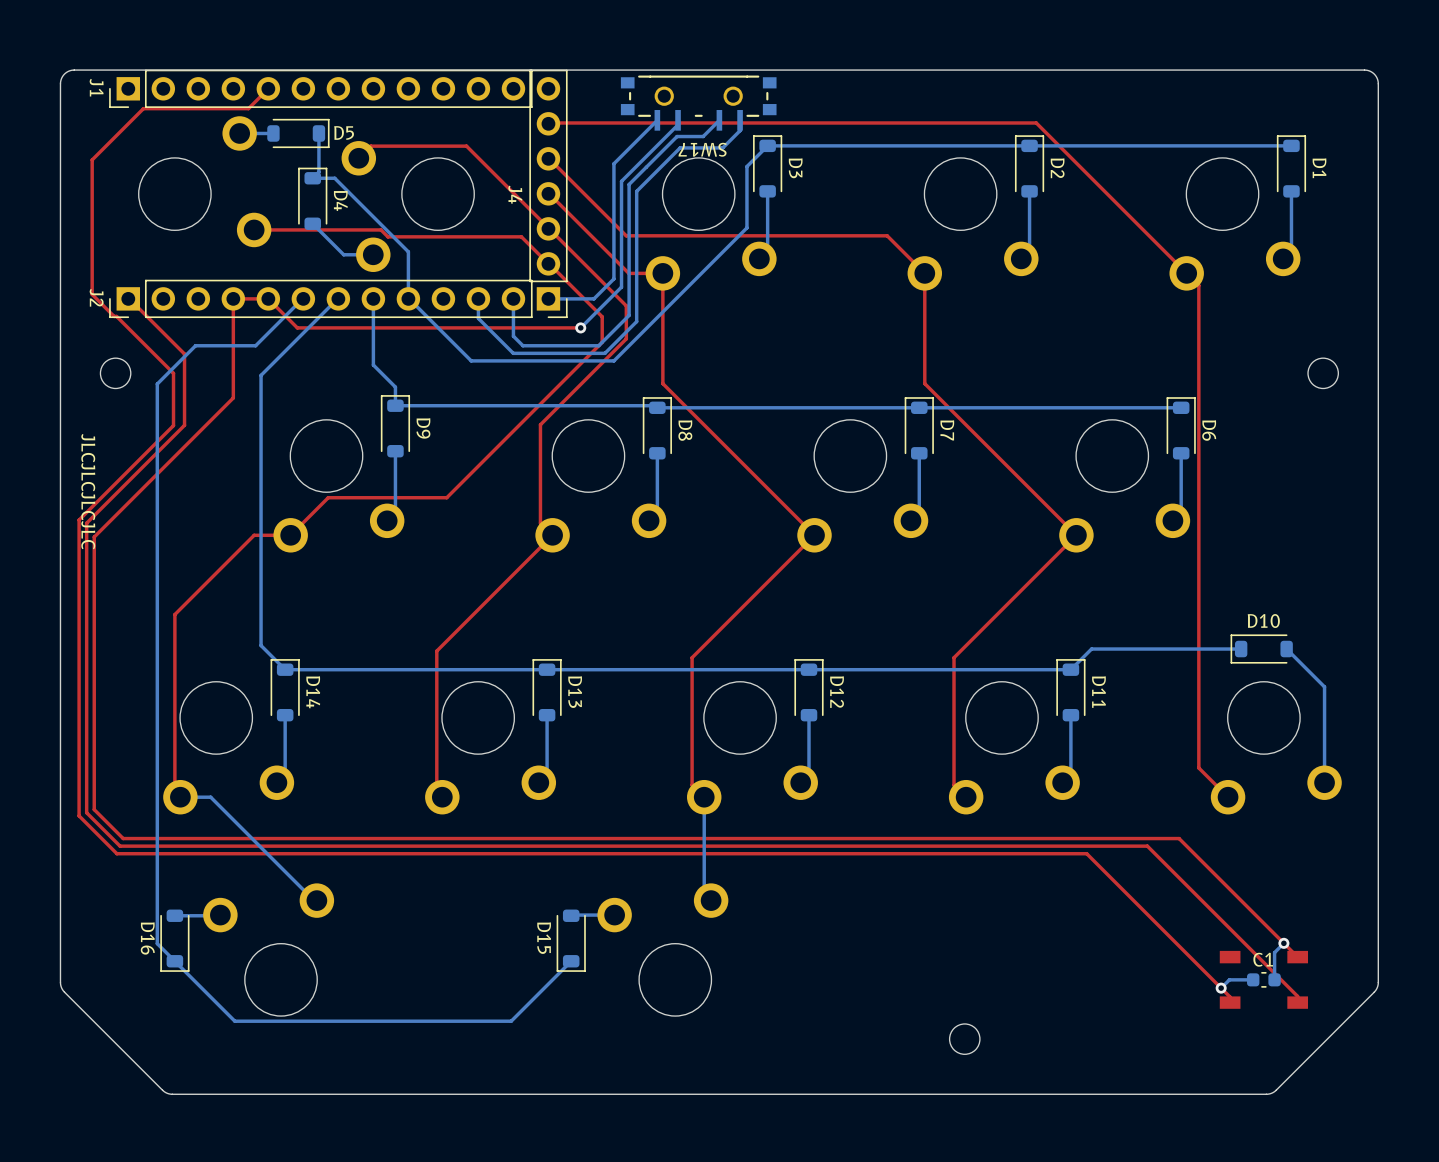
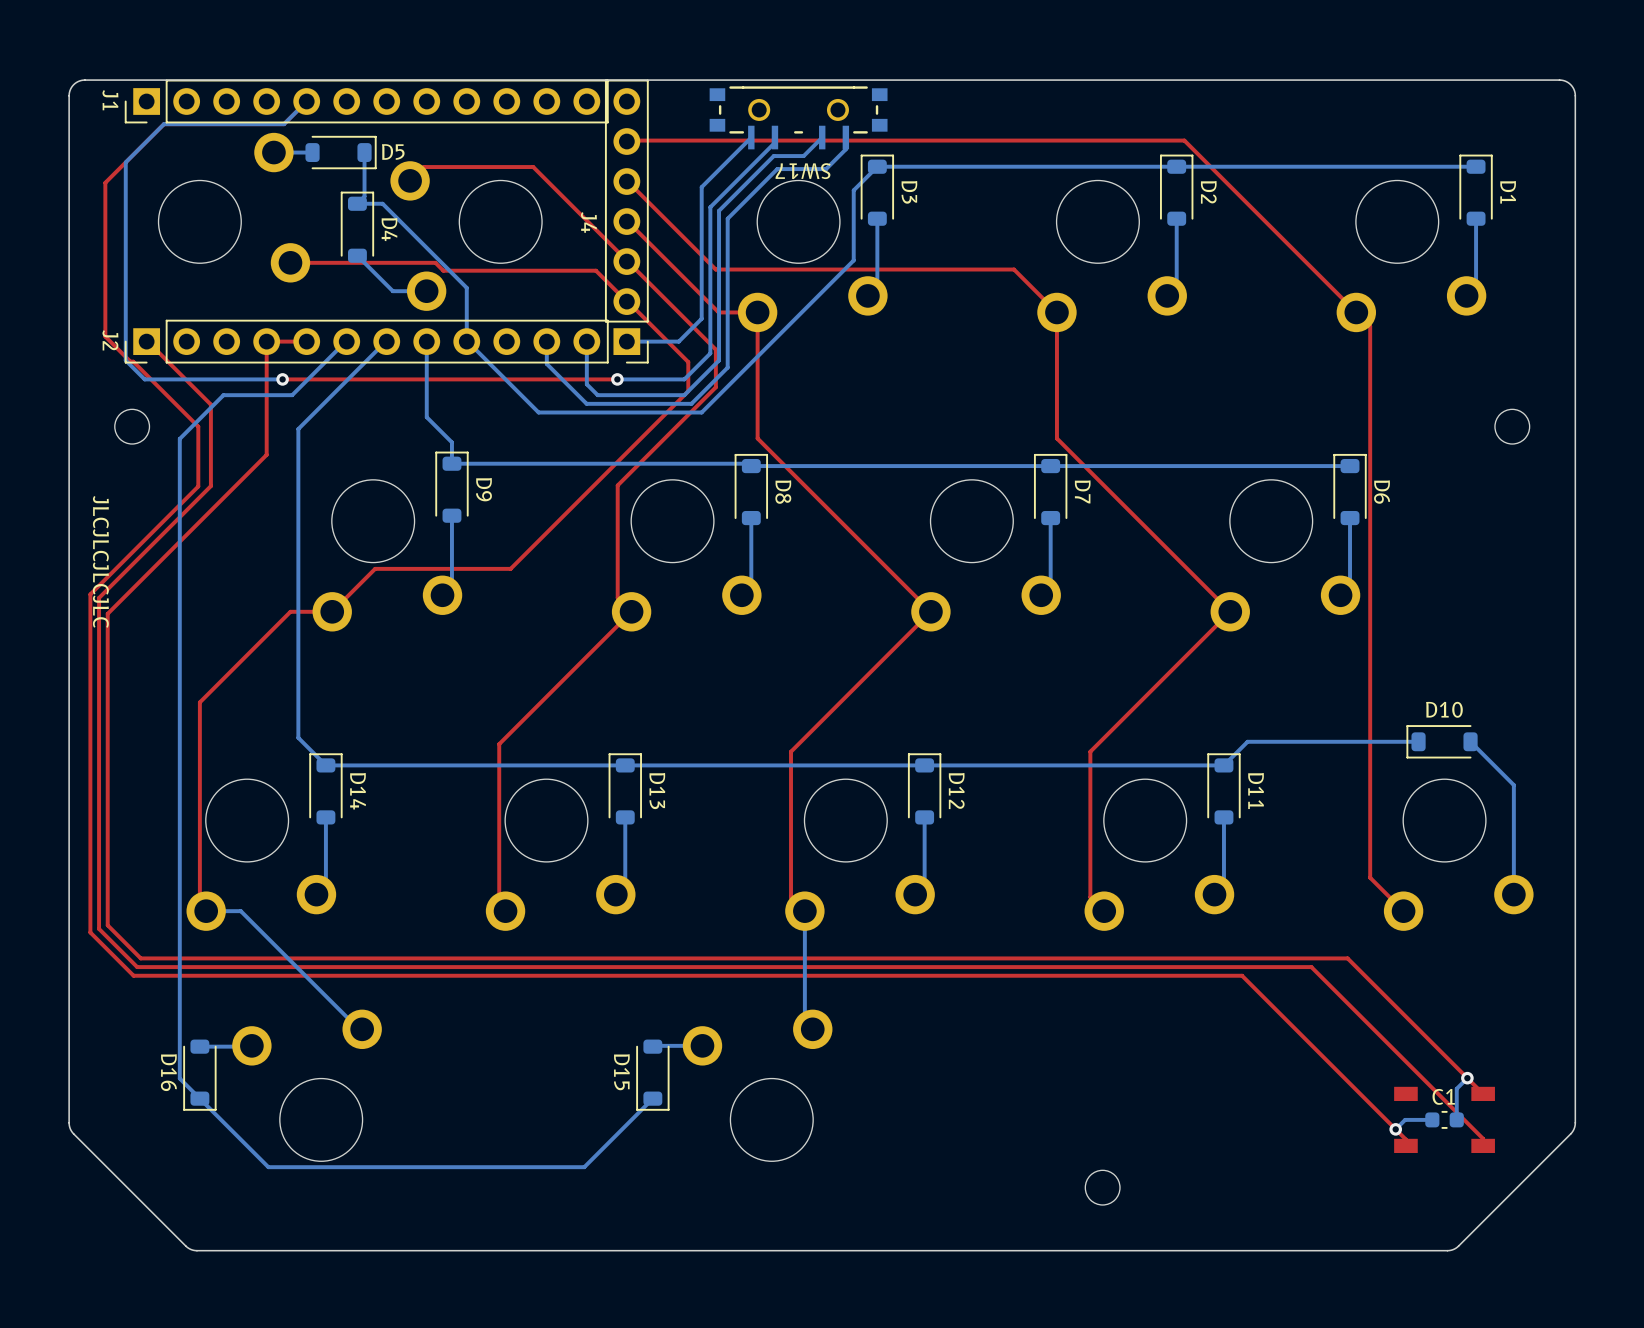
bottom track: none -> (306, 101) (284, 124) (163, 124) (125, 162) (125, 360) (144, 379) (282, 379)
bottom track: (621, 287) (580, 327) -> (710, 328) (710, 353) (684, 379) (617, 379)
top track: (268, 298) (297, 327) (580, 327) -> none
via position: (580, 327) -> (617, 379)
via: none -> (282, 379)
top track: none -> (617, 379) (282, 379)

